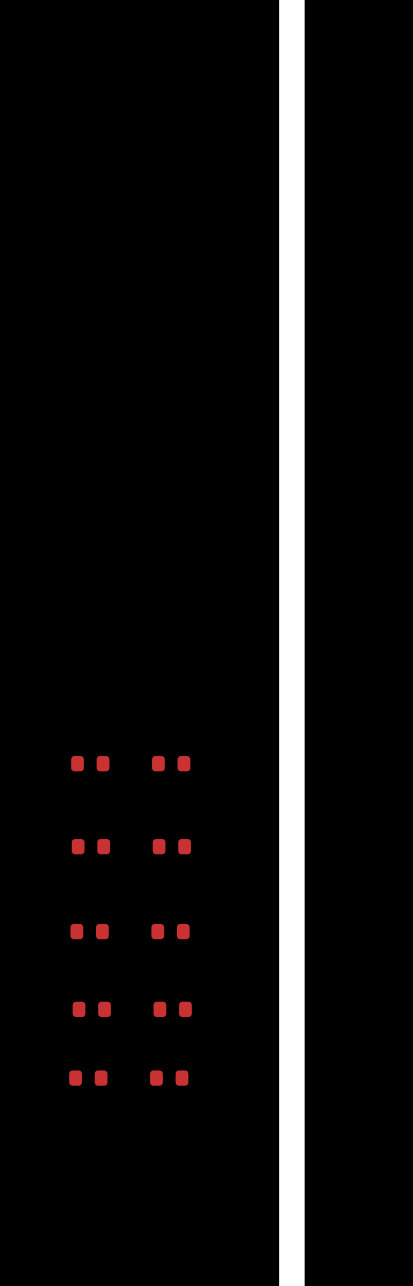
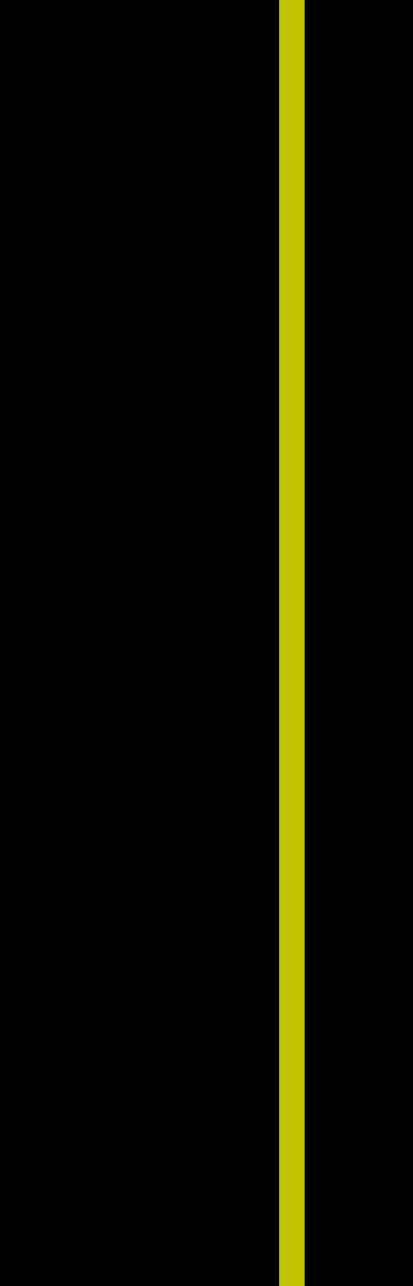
part: (90, 763) -> none
part: (171, 763) -> none
part: (90, 846) -> none
part: (171, 846) -> none
part: (89, 931) -> none
part: (170, 931) -> none
part: (91, 1009) -> none
part: (172, 1009) -> none
part: (88, 1078) -> none
part: (169, 1078) -> none

